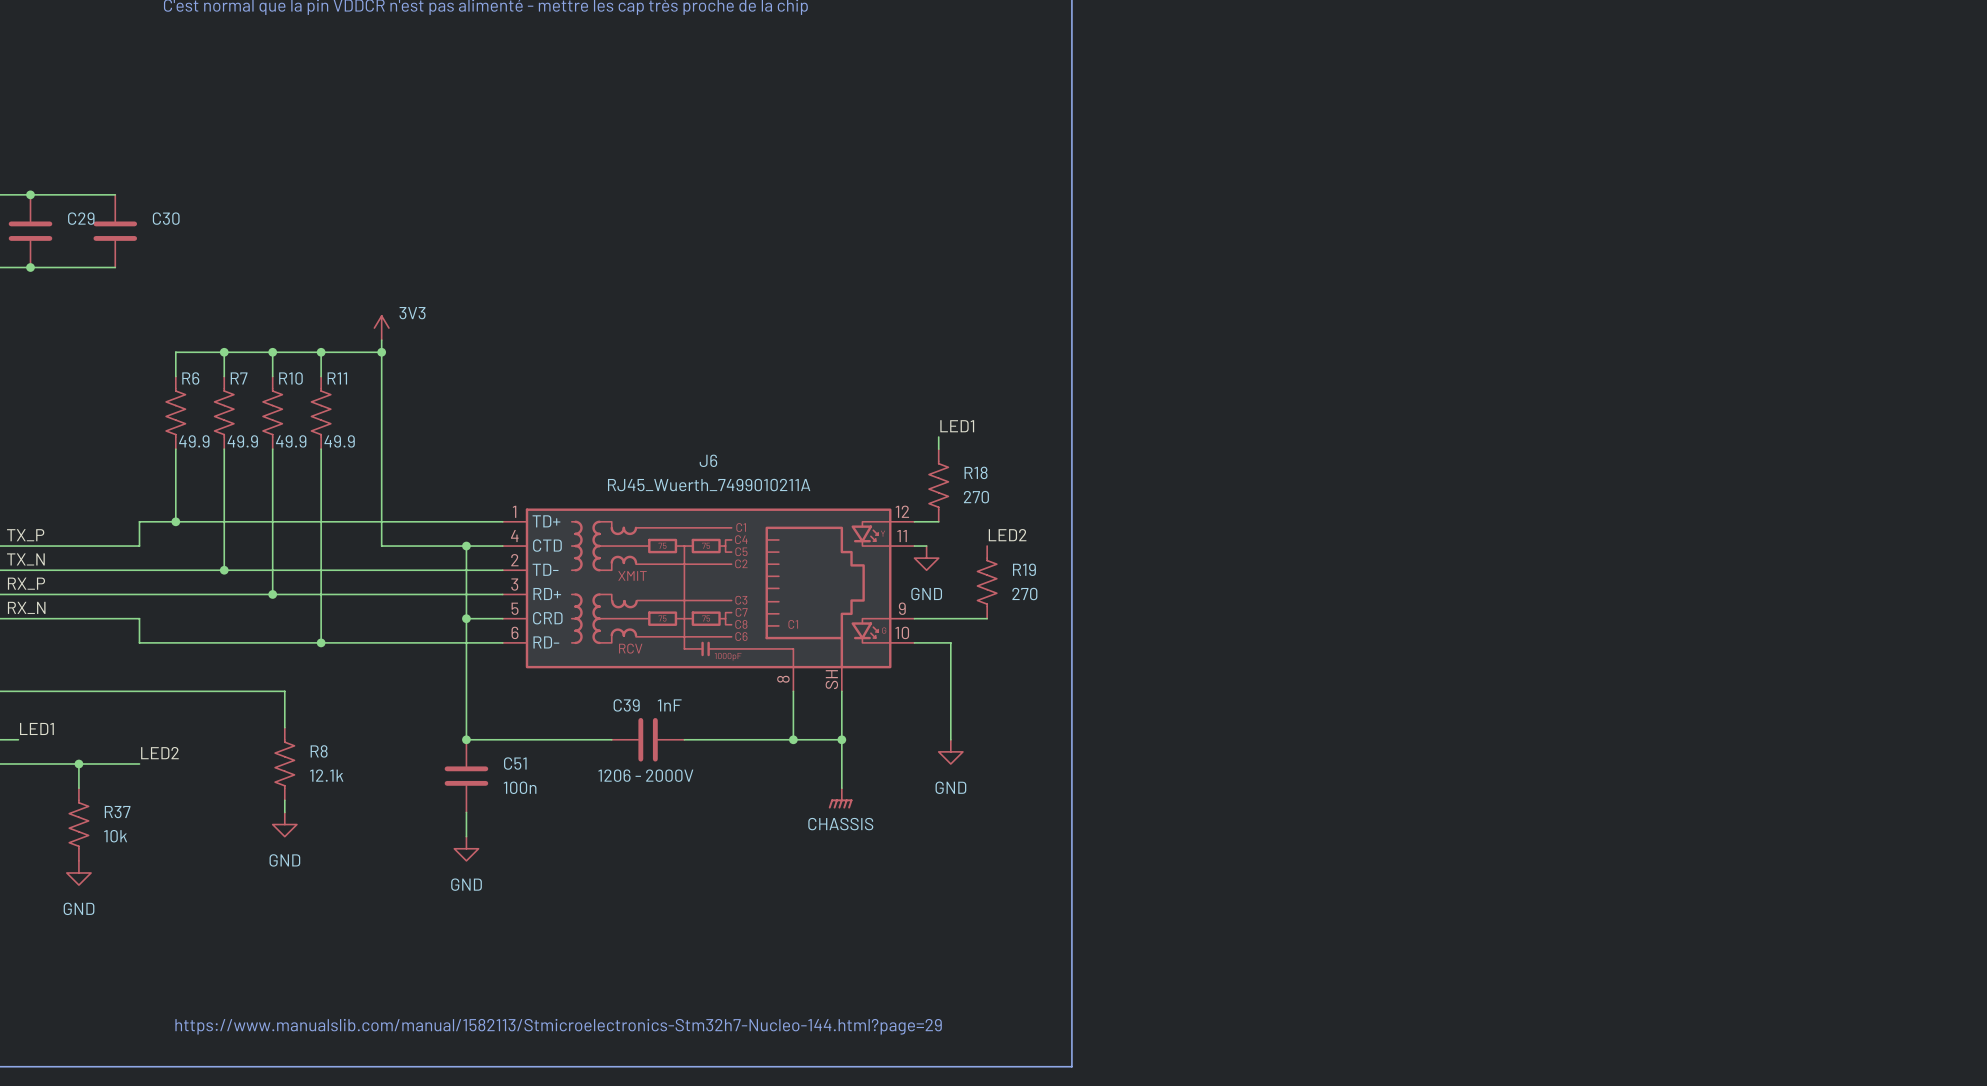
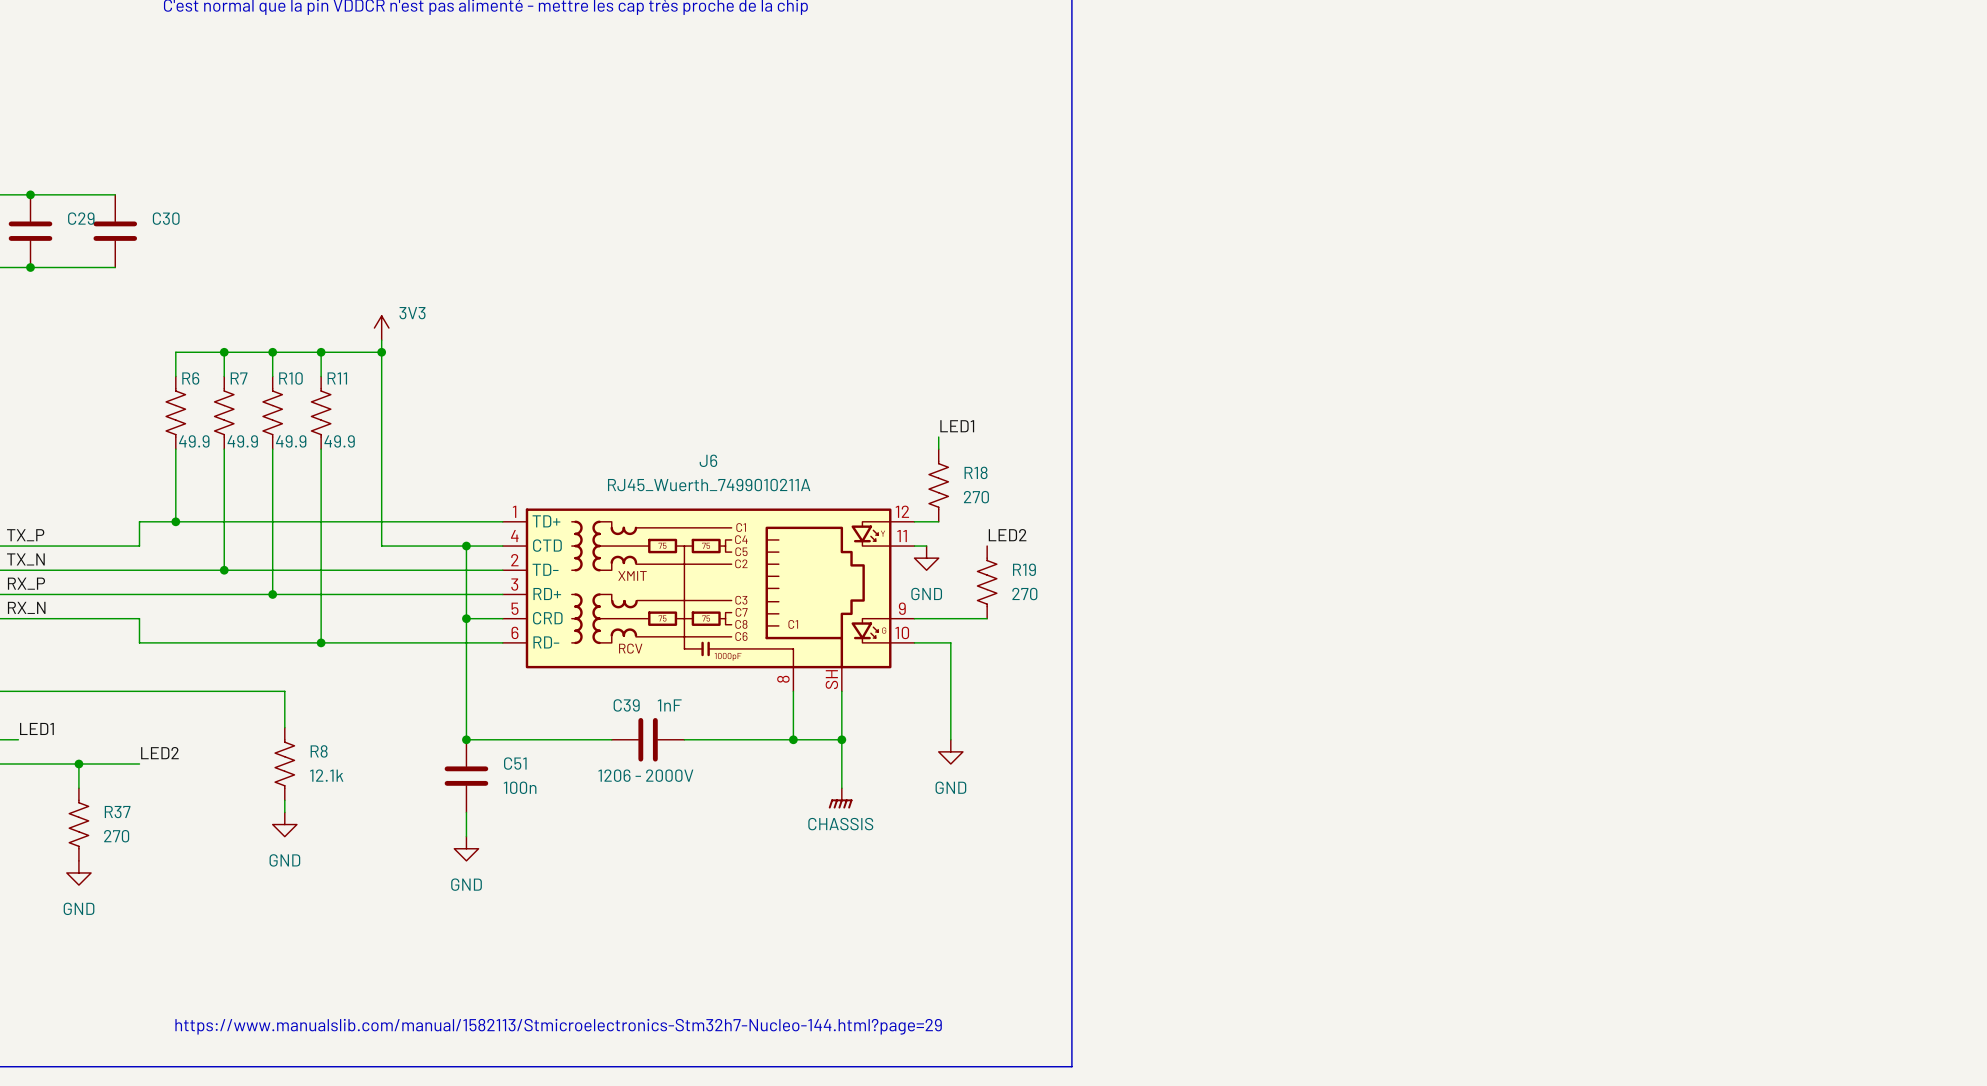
R37 value: 10k (115, 836) -> 270 (116, 836)

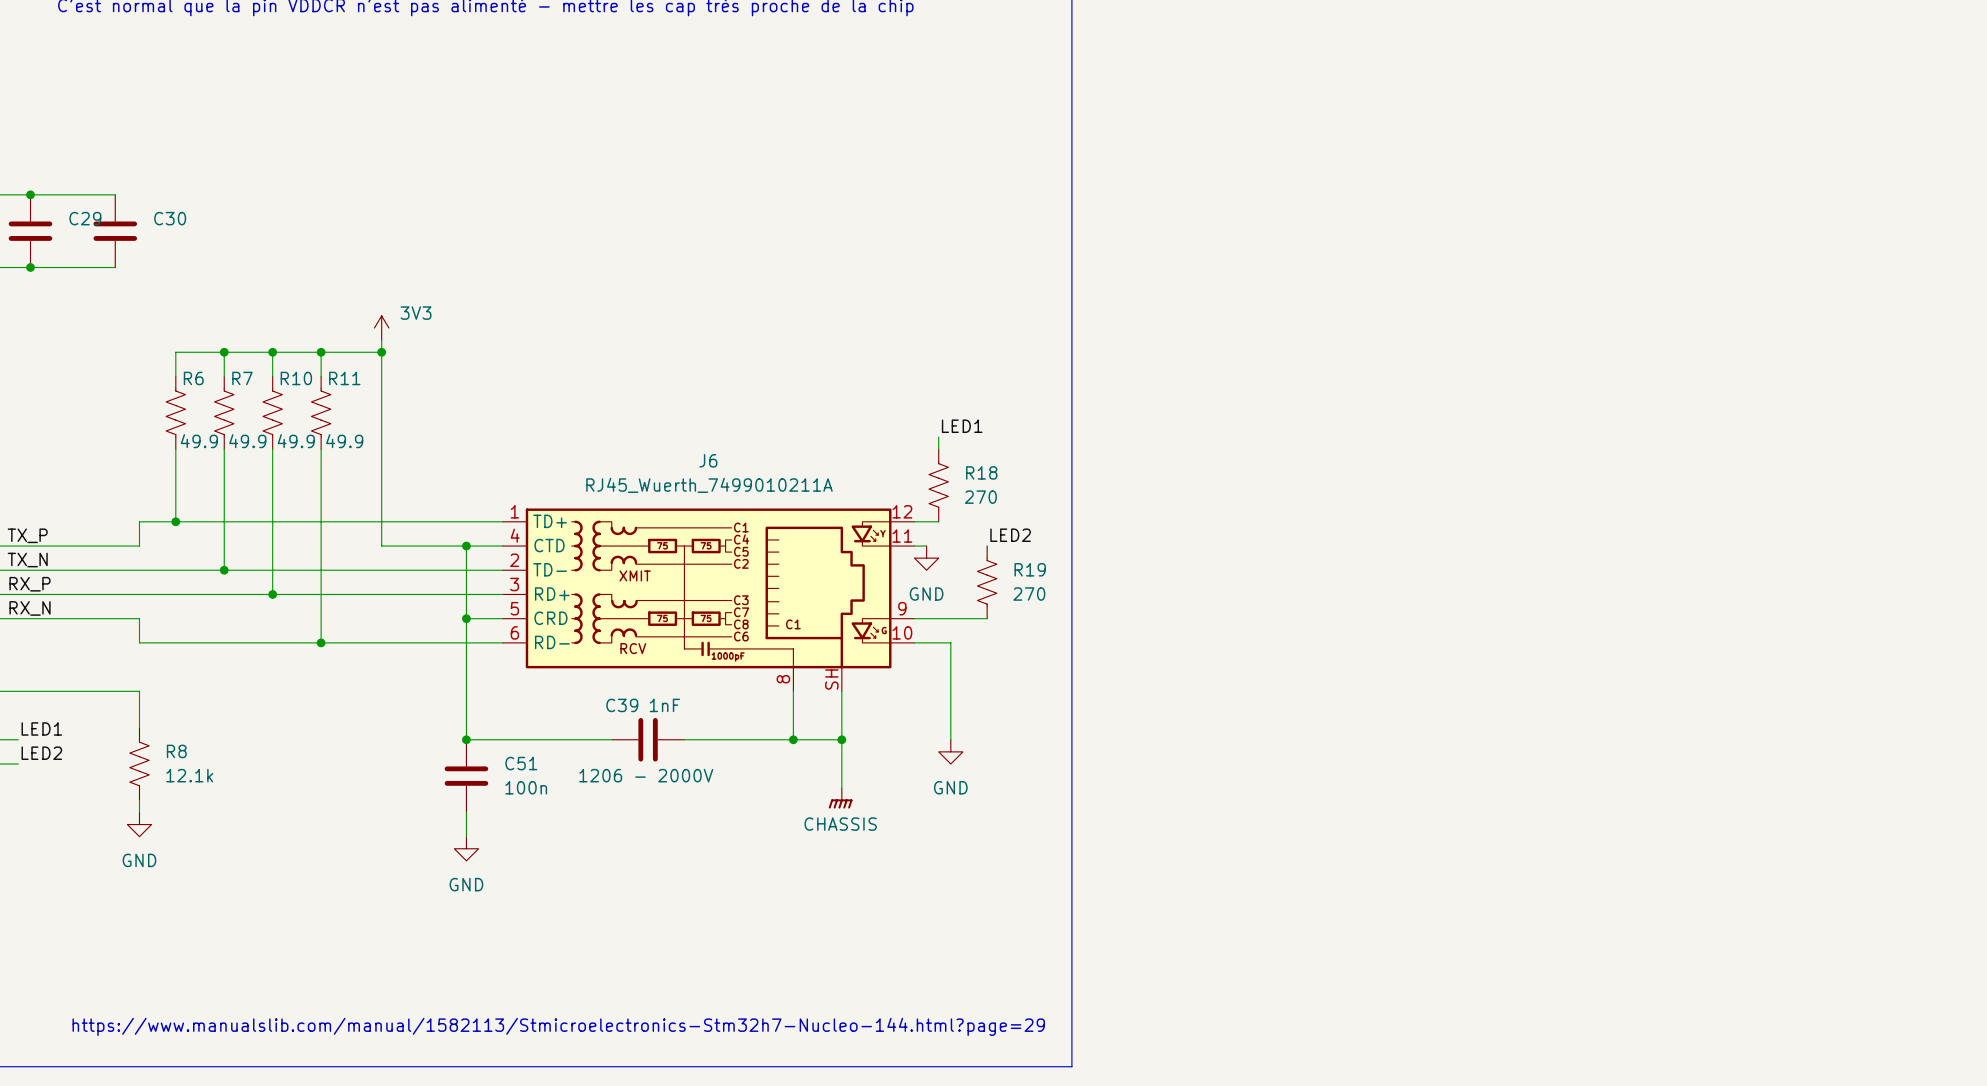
wire: (139, 691) (284, 691) (284, 727) -> (139, 691) (139, 727)
label position: LED2 (159, 753) -> LED2 (41, 753)
wire: (18, 763) (139, 763) -> none
wire: (78, 763) (78, 788) -> none
junction: (78, 763) -> none
R8 position: (284, 763) -> (139, 763)
wire: (284, 800) (284, 812) -> (139, 800) (139, 812)
R37: 270 (78, 824) -> none
power symbol: none -> GND (139, 824)
power symbol: GND (284, 824) -> none
power symbol: GND (78, 872) -> none

